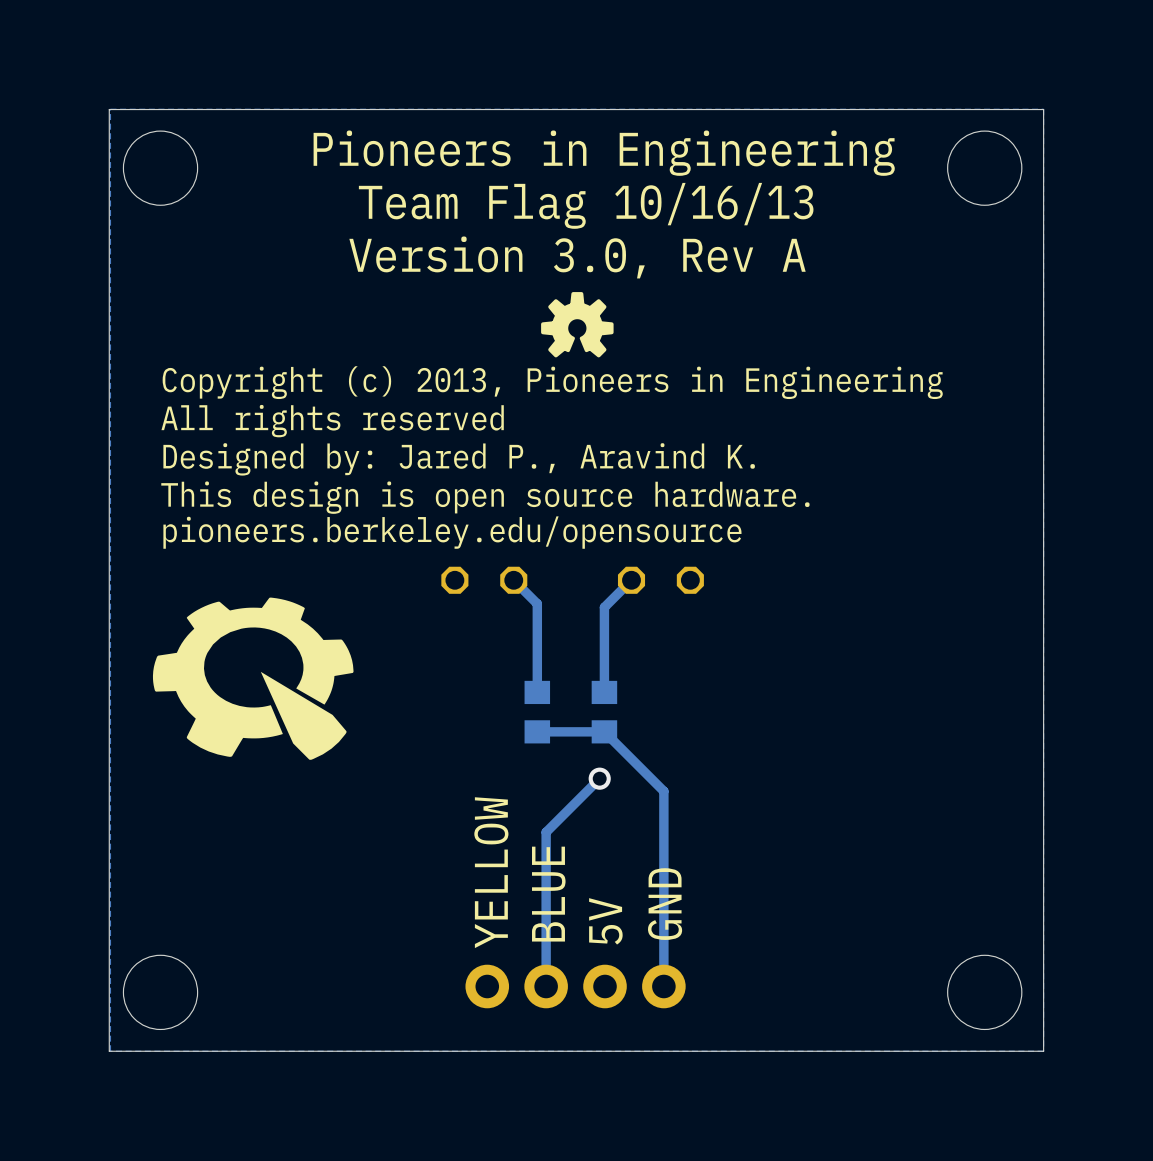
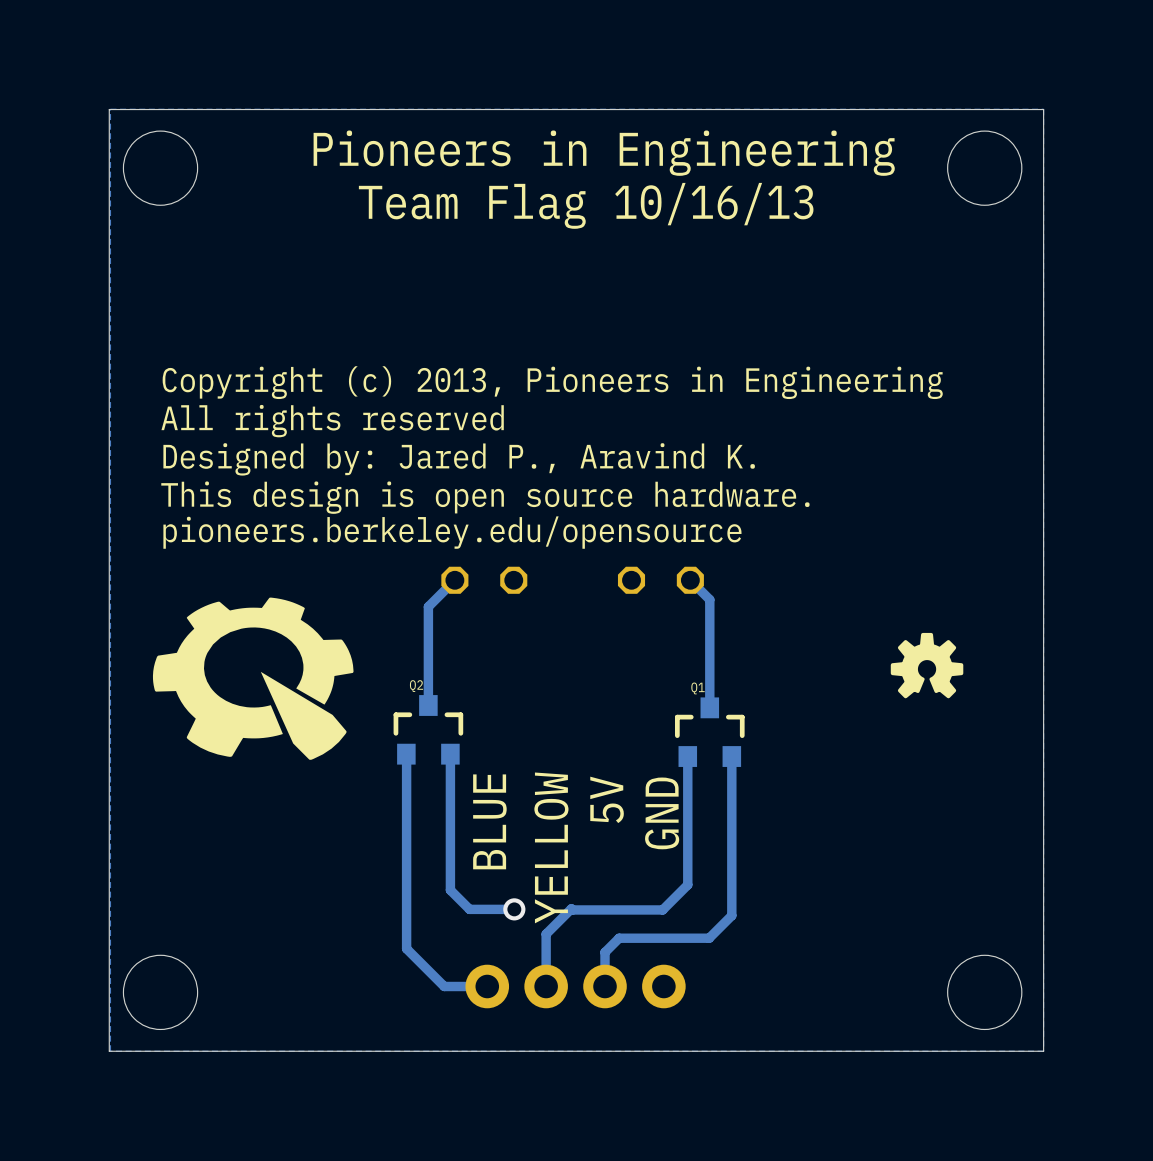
text: Version 3.0, Rev A (577, 257) -> none
drawing position: (577, 324) -> (927, 665)
track: none -> (454, 580) (428, 606) (428, 705)
track: (513, 580) (537, 603) (537, 692) -> none
track: (631, 580) (604, 607) (604, 692) -> none
track: none -> (690, 580) (709, 599) (709, 707)
part: (537, 712) -> none
part: (604, 712) -> none
Q2: none -> (428, 729)
track: (537, 731) (604, 731) (663, 791) (663, 986) -> none
Q1: none -> (709, 732)
track: none -> (406, 754) (406, 948) (444, 986) (487, 986)
track: none -> (450, 754) (450, 890) (469, 909) (514, 909)
track: none -> (731, 756) (731, 915) (709, 938) (619, 938) (605, 952) (605, 986)
track: (599, 778) (546, 832) (546, 934) -> (687, 756) (687, 884) (662, 909) (571, 908) (546, 934)
via: (599, 778) -> none
text position: YELLOW (491, 872) -> YELLOW (551, 847)
text position: BLUE (548, 894) -> BLUE (489, 821)
text position: GND (665, 904) -> GND (662, 813)
via: none -> (514, 909)
text position: 5V (605, 921) -> 5V (607, 799)

